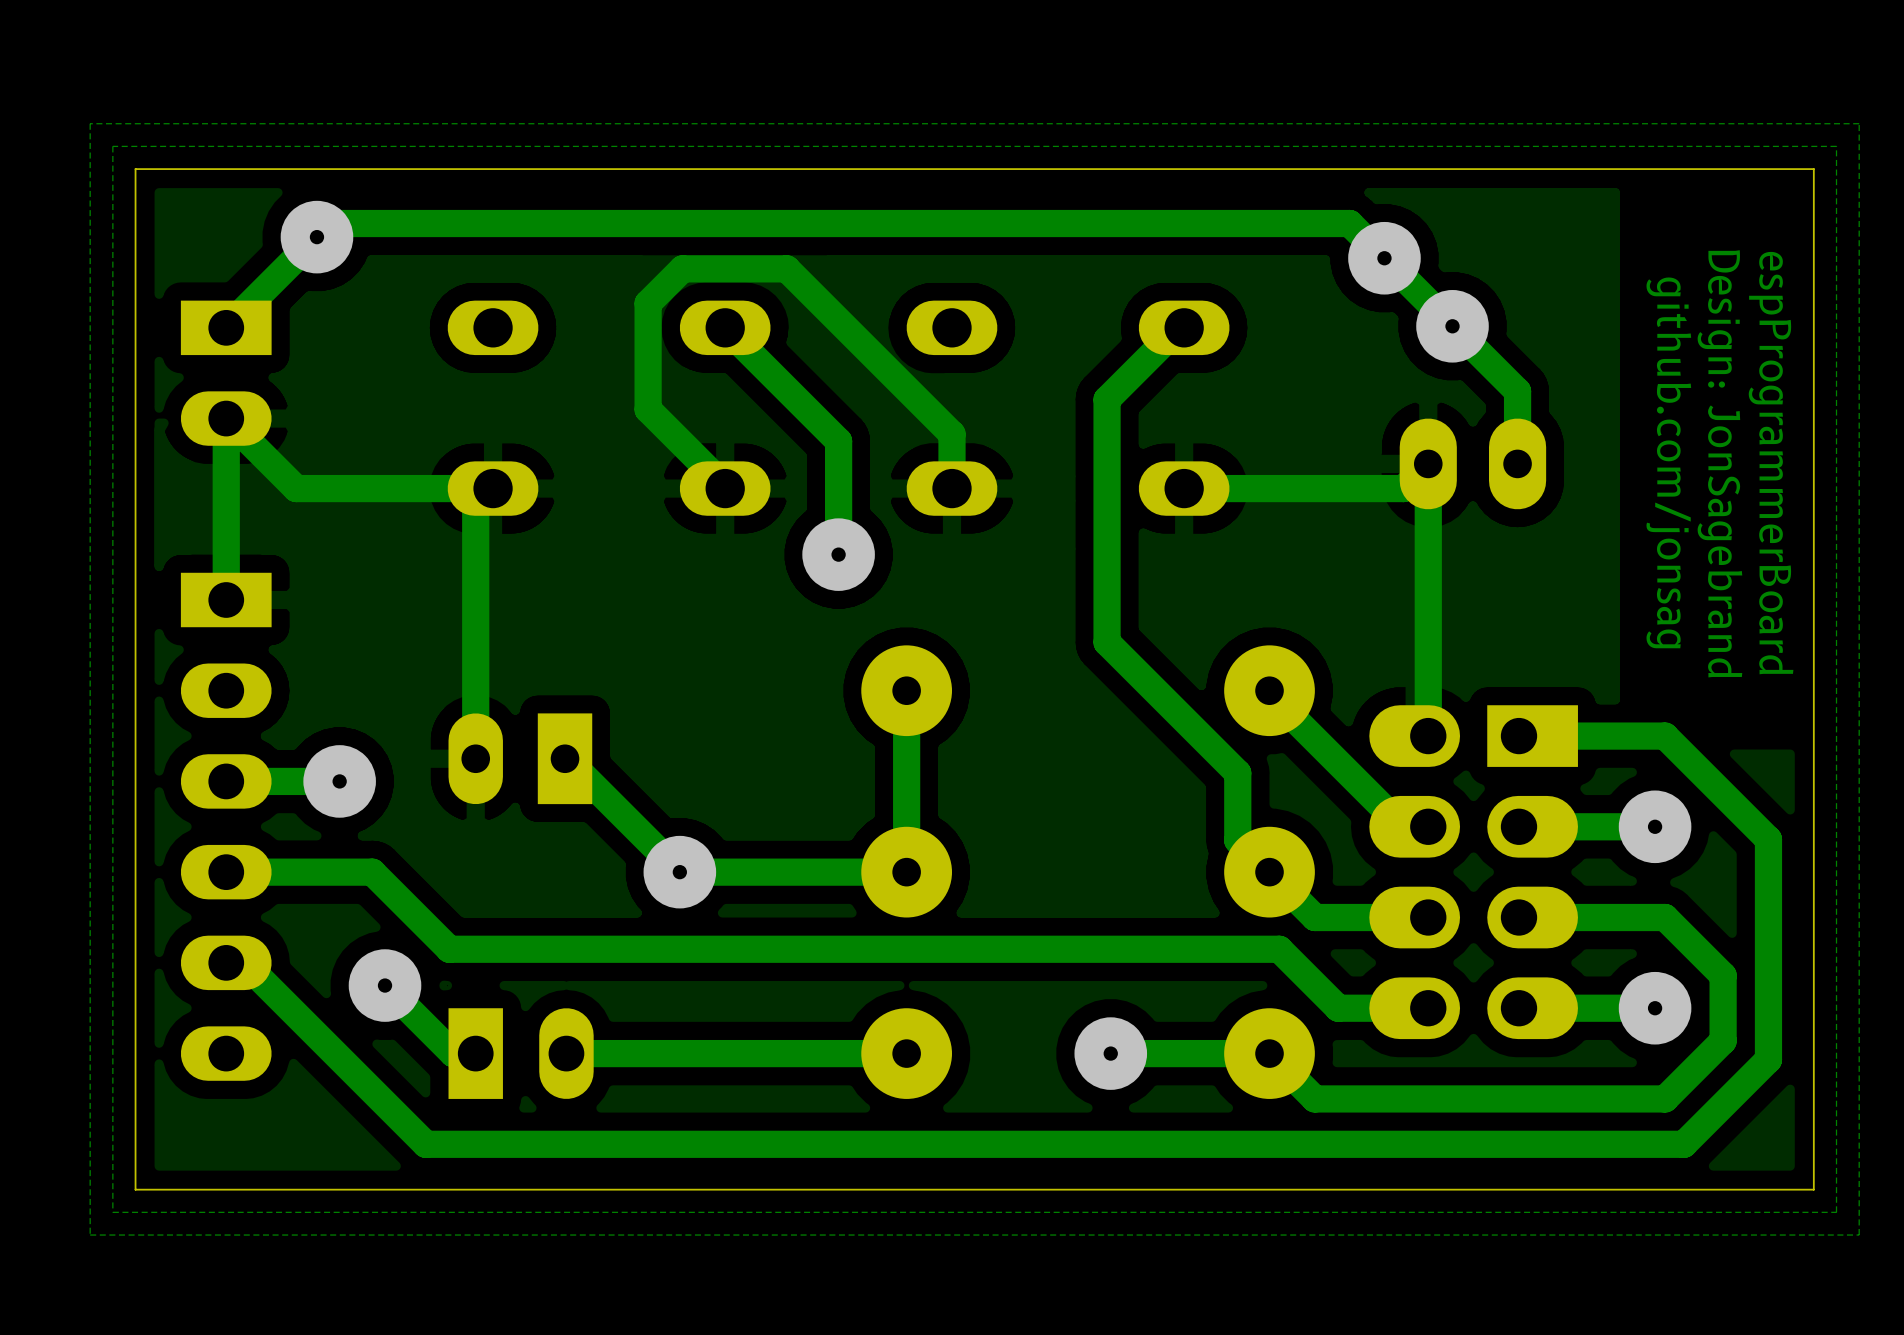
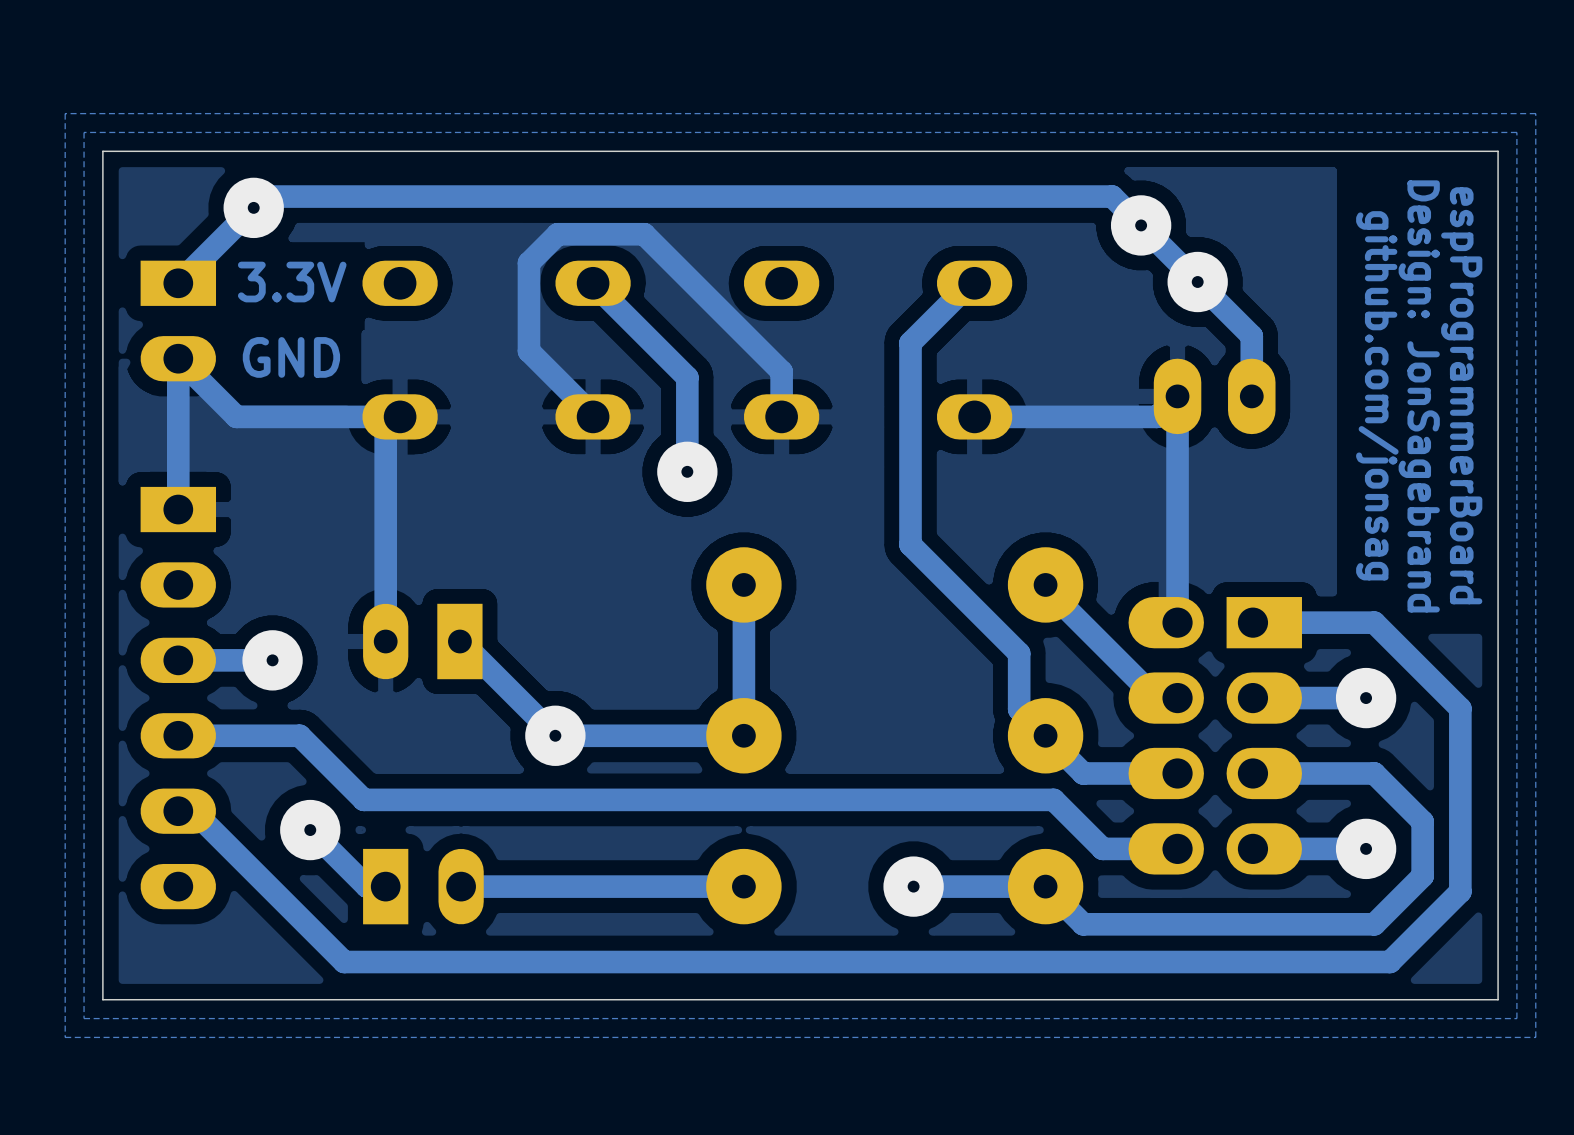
text: none -> 3.3V (292, 282)
text: none -> GND (291, 357)

